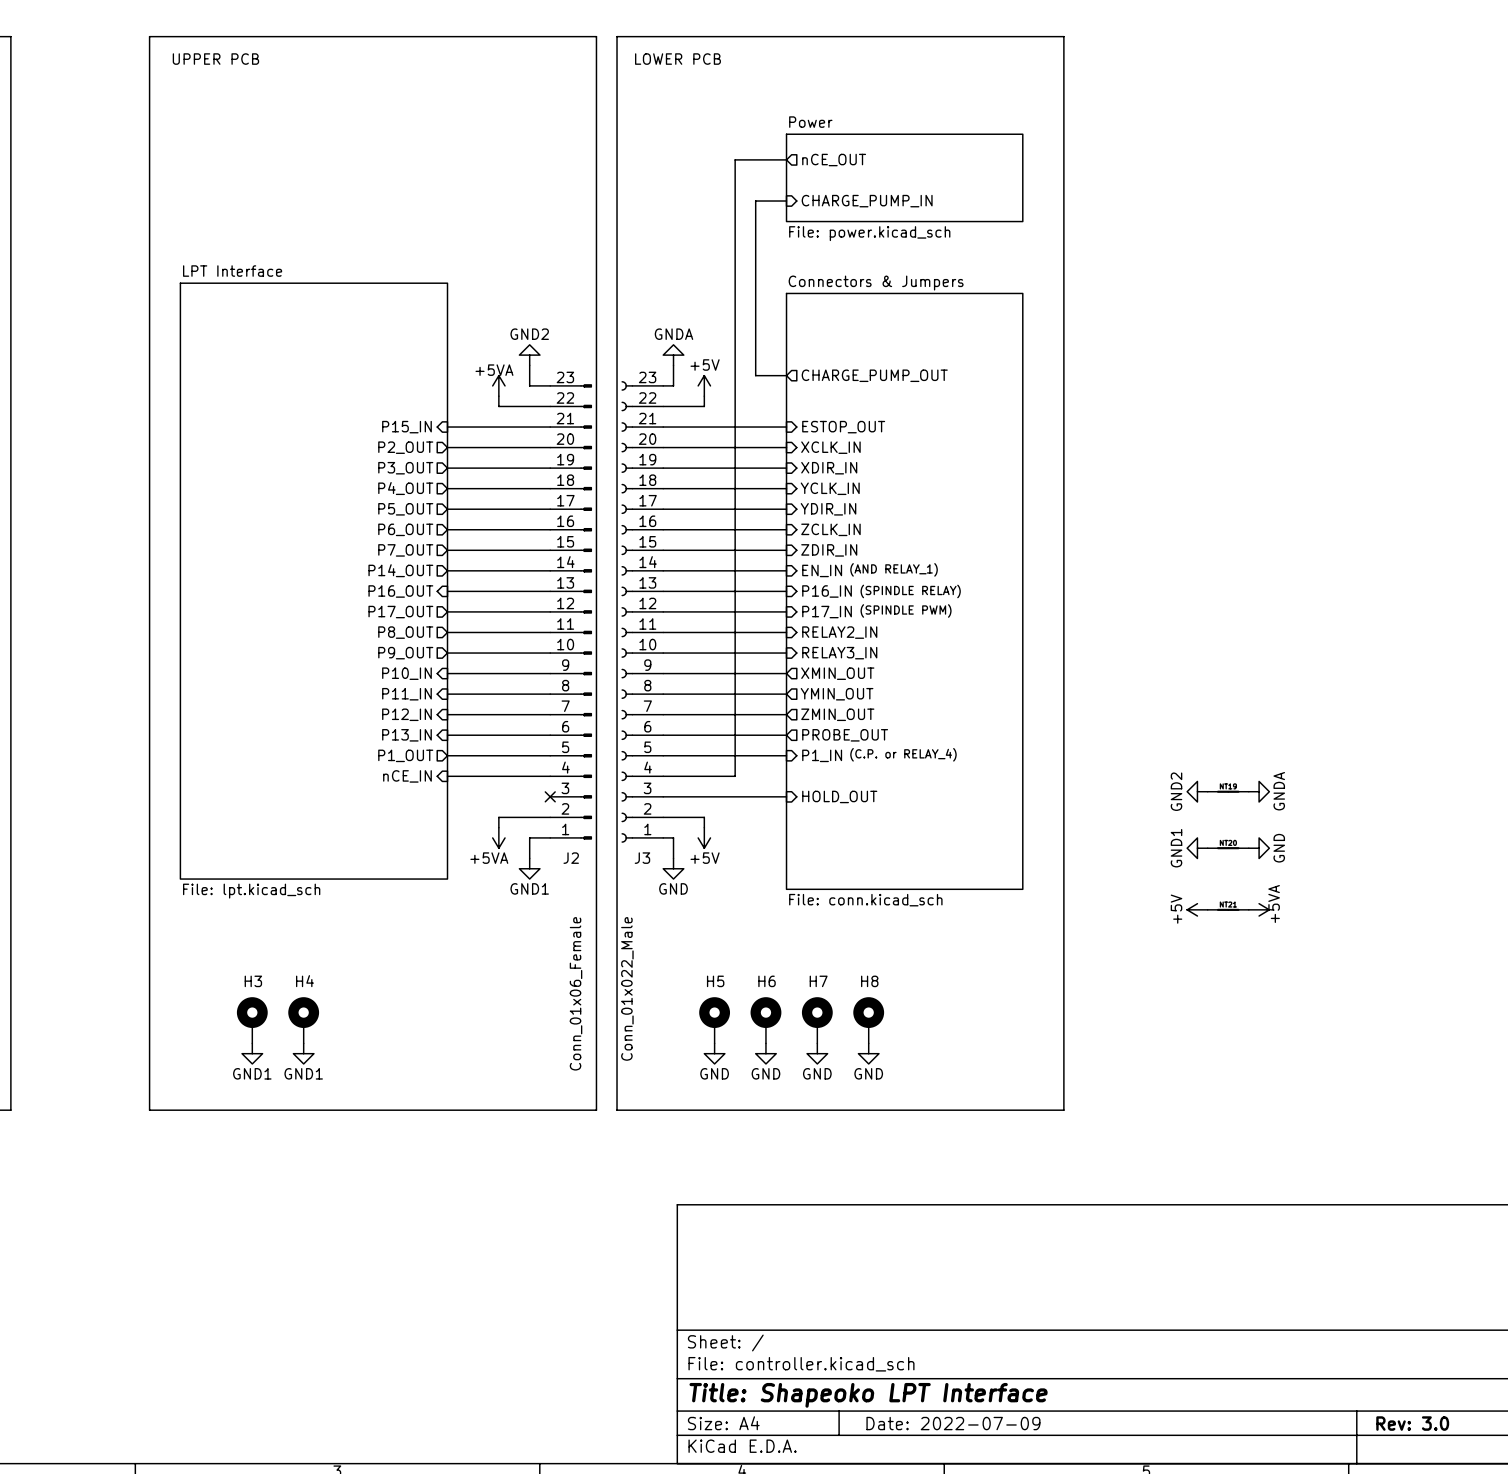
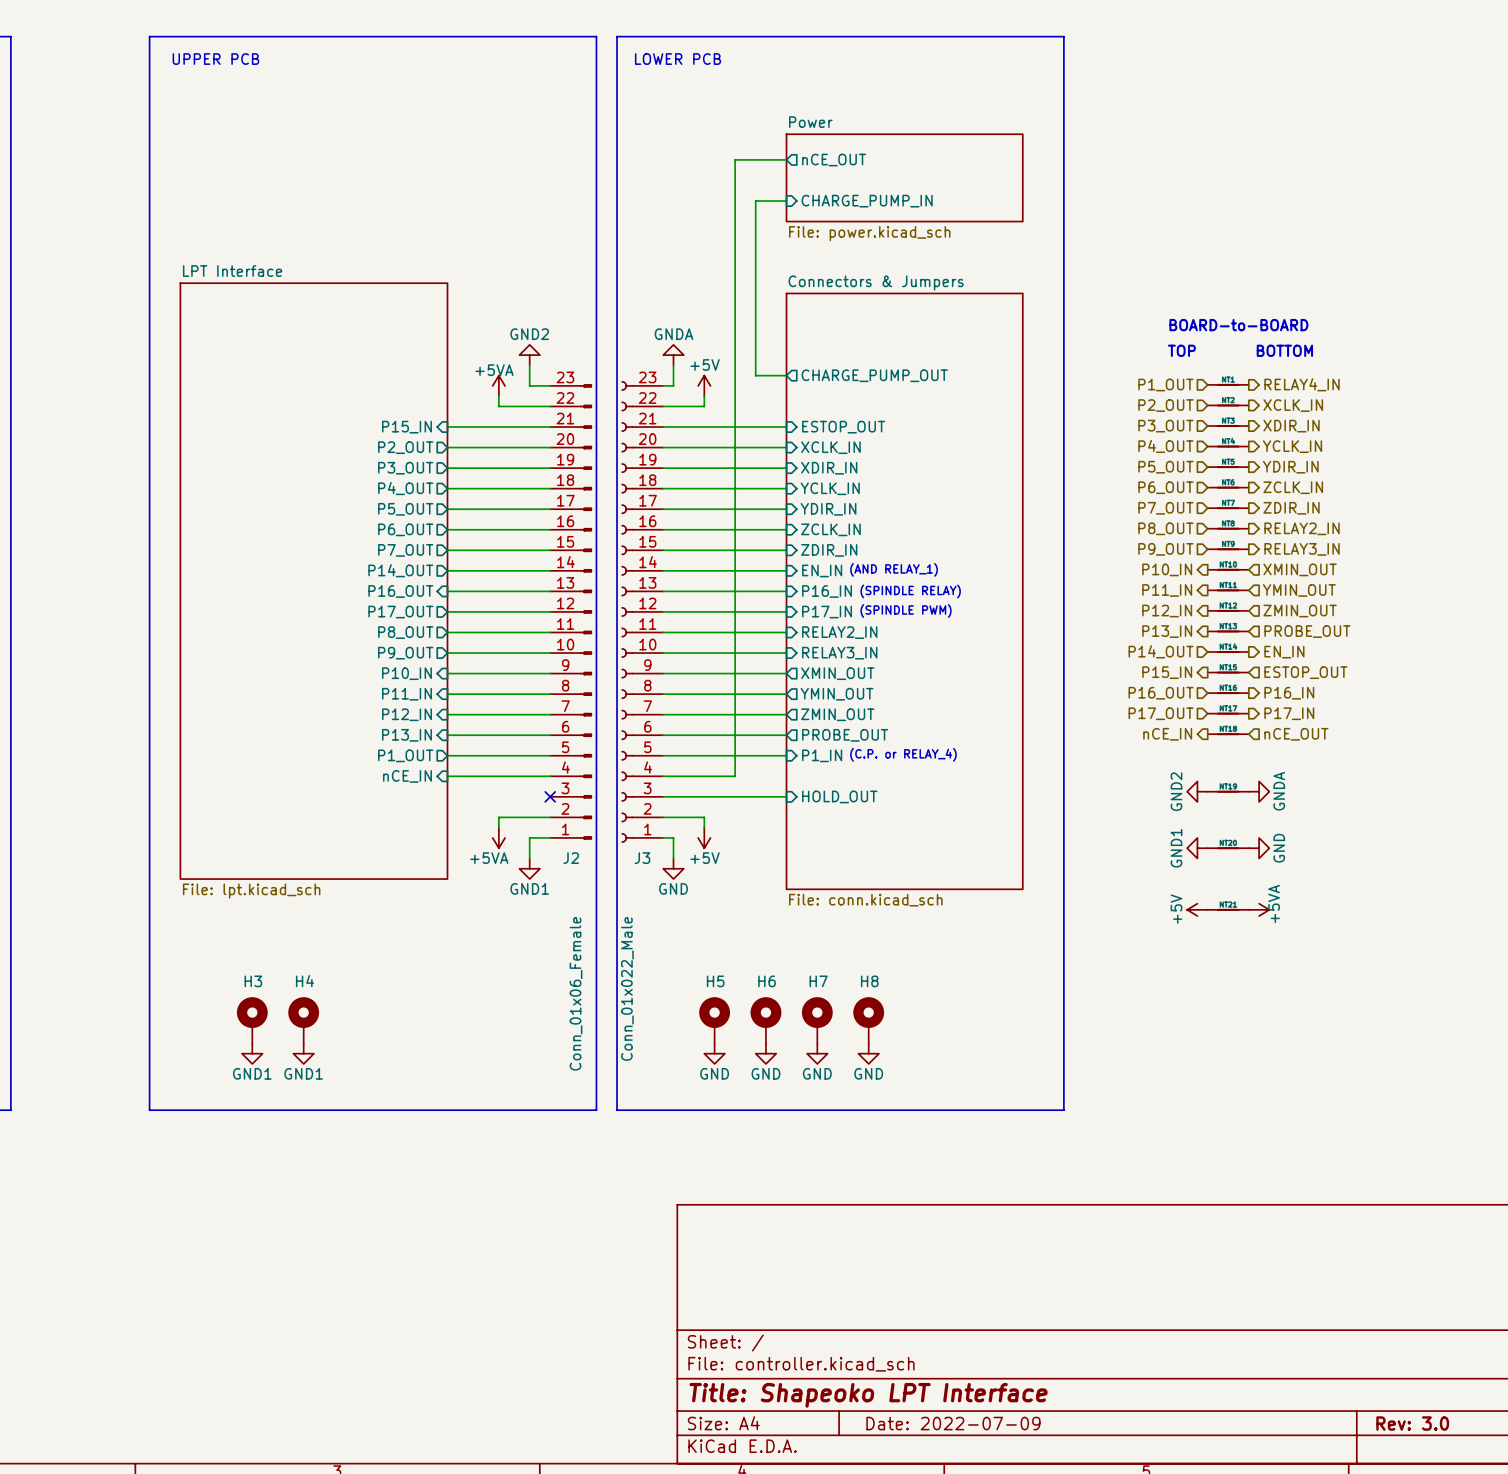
text: none -> BOARD-to-BOARD (1238, 325)
text: none -> TOP (1181, 350)
text: none -> BOTTOM (1284, 350)
part: none -> (1228, 384)
hierarchical label: none -> RELAY4_IN (1302, 384)
hierarchical label: none -> P1_OUT (1165, 385)
hierarchical label: none -> P2_OUT (1165, 405)
part: none -> (1228, 405)
hierarchical label: none -> XCLK_IN (1293, 405)
part: none -> (1228, 425)
hierarchical label: none -> P3_OUT (1165, 426)
hierarchical label: none -> XDIR_IN (1291, 426)
hierarchical label: none -> P4_OUT (1165, 446)
part: none -> (1228, 446)
hierarchical label: none -> YCLK_IN (1292, 446)
hierarchical label: none -> P5_OUT (1165, 467)
part: none -> (1228, 467)
hierarchical label: none -> YDIR_IN (1290, 467)
hierarchical label: none -> P6_OUT (1165, 487)
part: none -> (1228, 487)
hierarchical label: none -> ZCLK_IN (1293, 487)
hierarchical label: none -> P7_OUT (1165, 508)
part: none -> (1228, 508)
hierarchical label: none -> ZDIR_IN (1291, 508)
hierarchical label: none -> P8_OUT (1165, 528)
part: none -> (1228, 528)
hierarchical label: none -> RELAY2_IN (1302, 528)
hierarchical label: none -> P9_OUT (1165, 549)
part: none -> (1228, 549)
hierarchical label: none -> RELAY3_IN (1302, 549)
hierarchical label: none -> P10_IN (1167, 569)
part: none -> (1228, 569)
hierarchical label: none -> XMIN_OUT (1300, 569)
hierarchical label: none -> P11_IN (1167, 590)
part: none -> (1228, 590)
hierarchical label: none -> YMIN_OUT (1299, 590)
part: none -> (1228, 610)
hierarchical label: none -> P12_IN (1167, 611)
hierarchical label: none -> ZMIN_OUT (1300, 611)
hierarchical label: none -> P13_IN (1167, 631)
part: none -> (1228, 631)
hierarchical label: none -> PROBE_OUT (1307, 631)
hierarchical label: none -> P14_OUT (1161, 651)
part: none -> (1228, 652)
hierarchical label: none -> EN_IN (1284, 652)
hierarchical label: none -> P15_IN (1167, 672)
part: none -> (1228, 672)
hierarchical label: none -> ESTOP_OUT (1305, 672)
hierarchical label: none -> P16_OUT (1161, 693)
part: none -> (1228, 693)
hierarchical label: none -> P16_IN (1289, 693)
hierarchical label: none -> P17_OUT (1161, 713)
part: none -> (1228, 713)
hierarchical label: none -> P17_IN (1289, 713)
hierarchical label: none -> nCE_IN (1167, 734)
part: none -> (1228, 734)
hierarchical label: none -> nCE_OUT (1296, 734)

